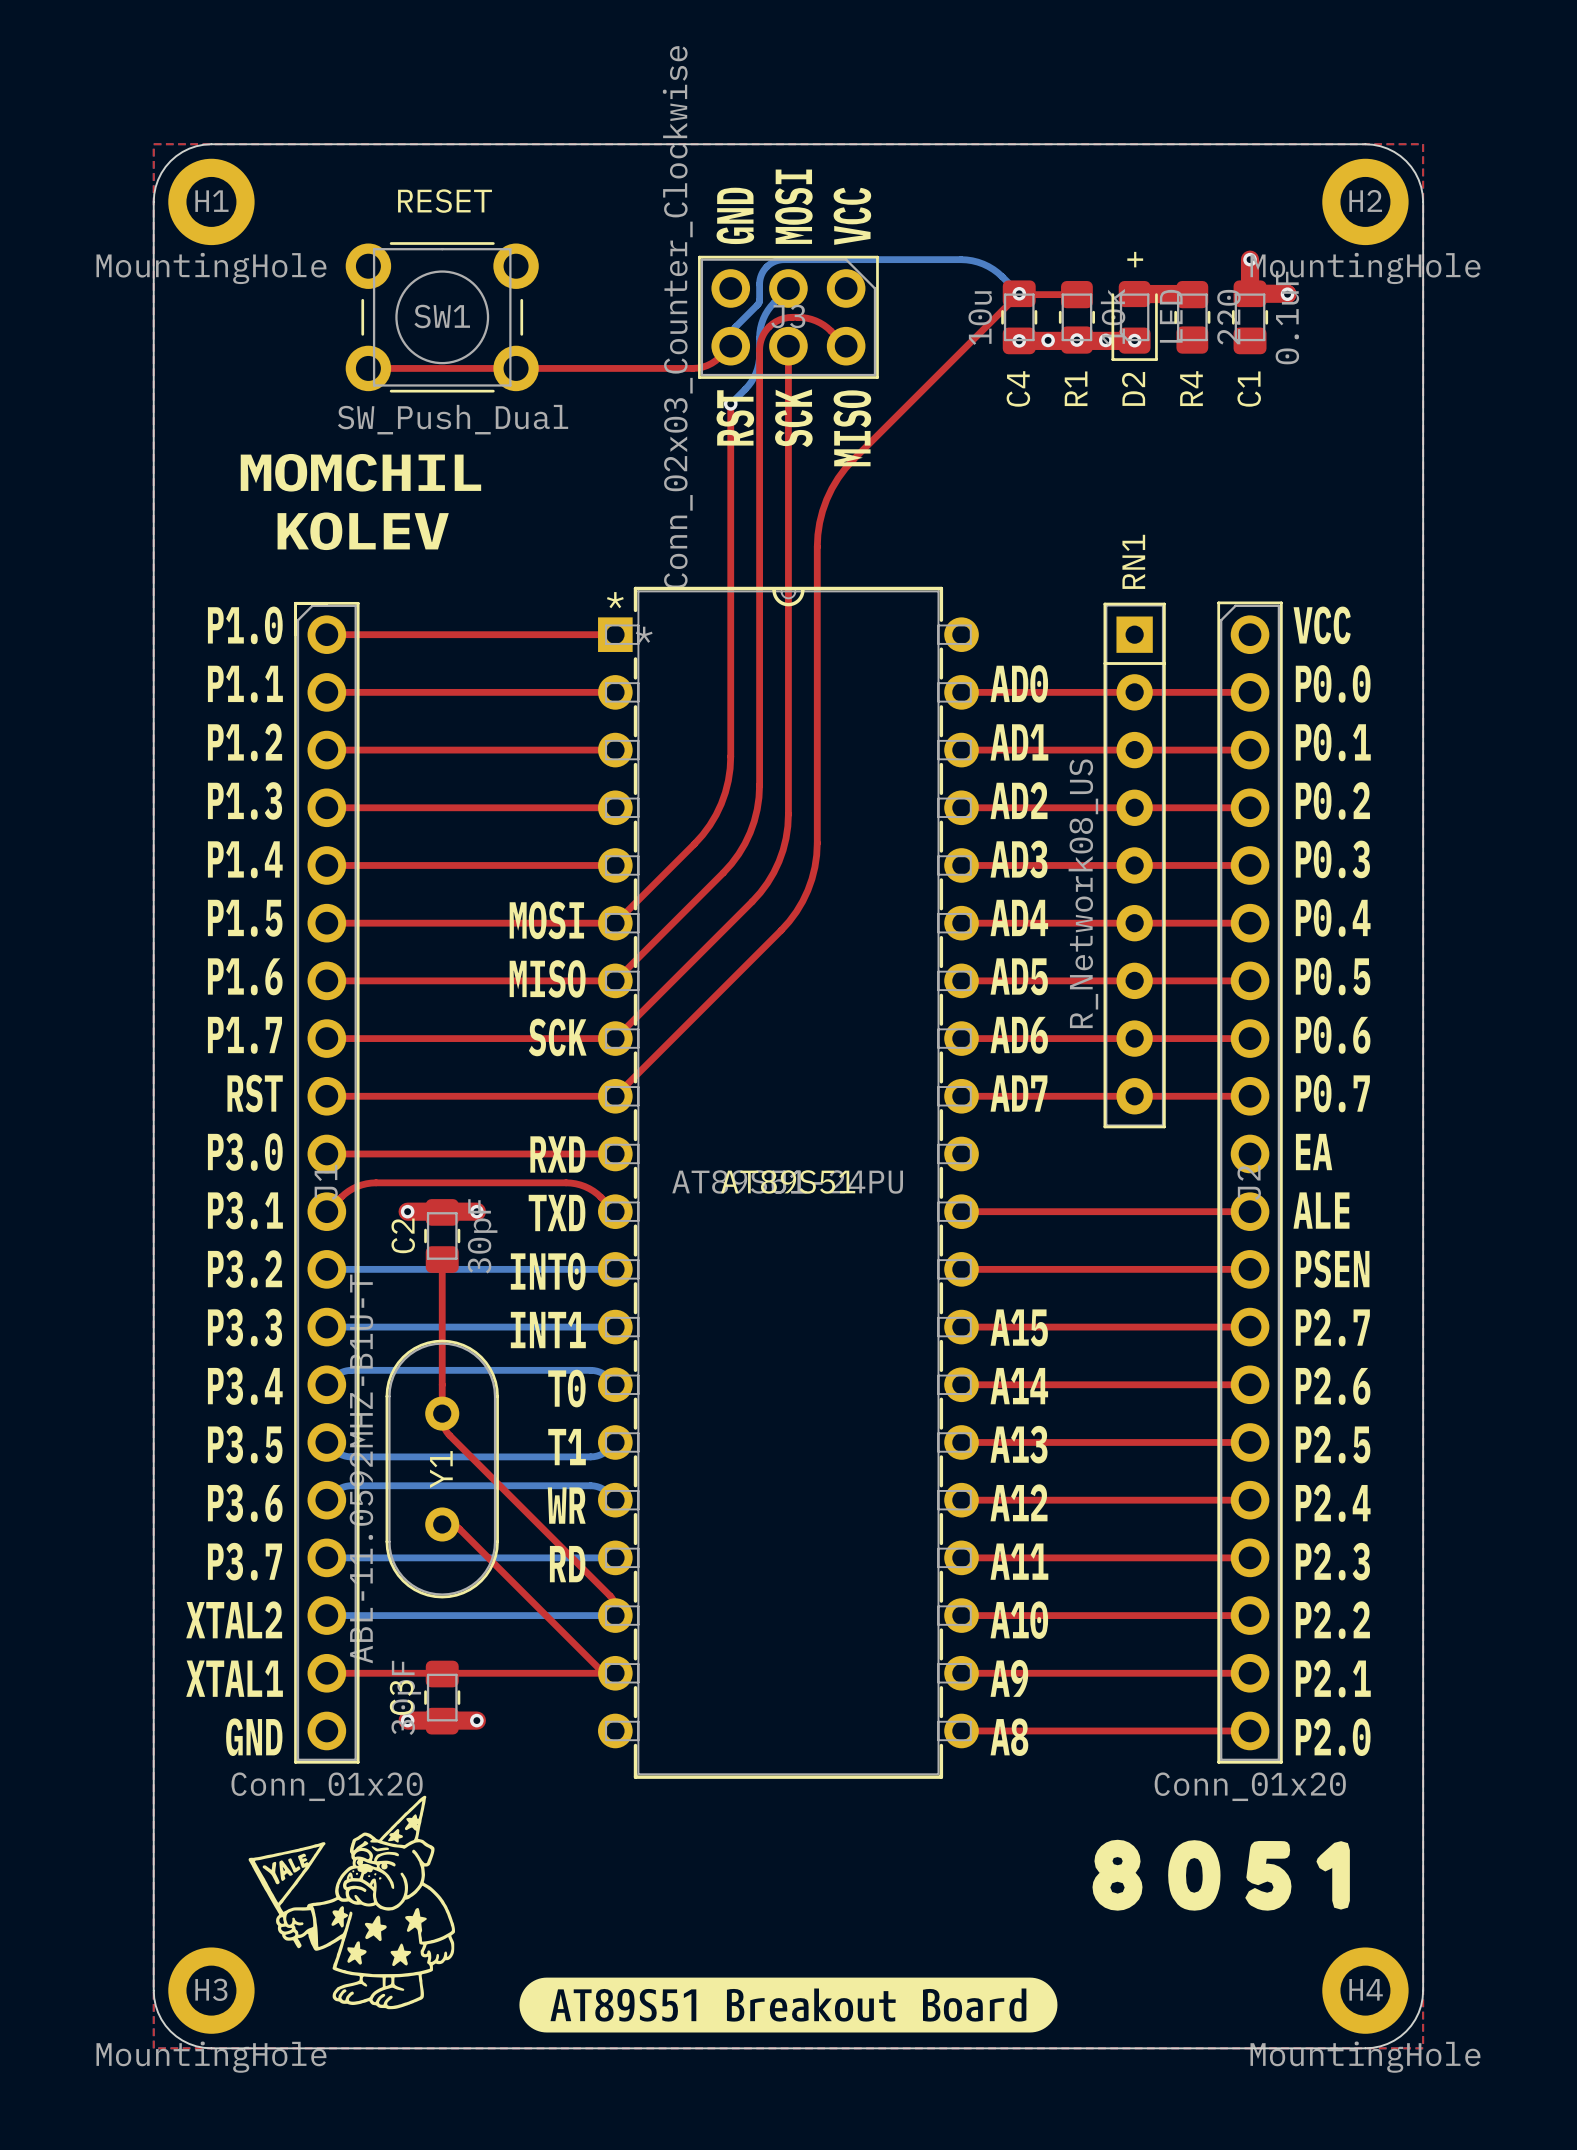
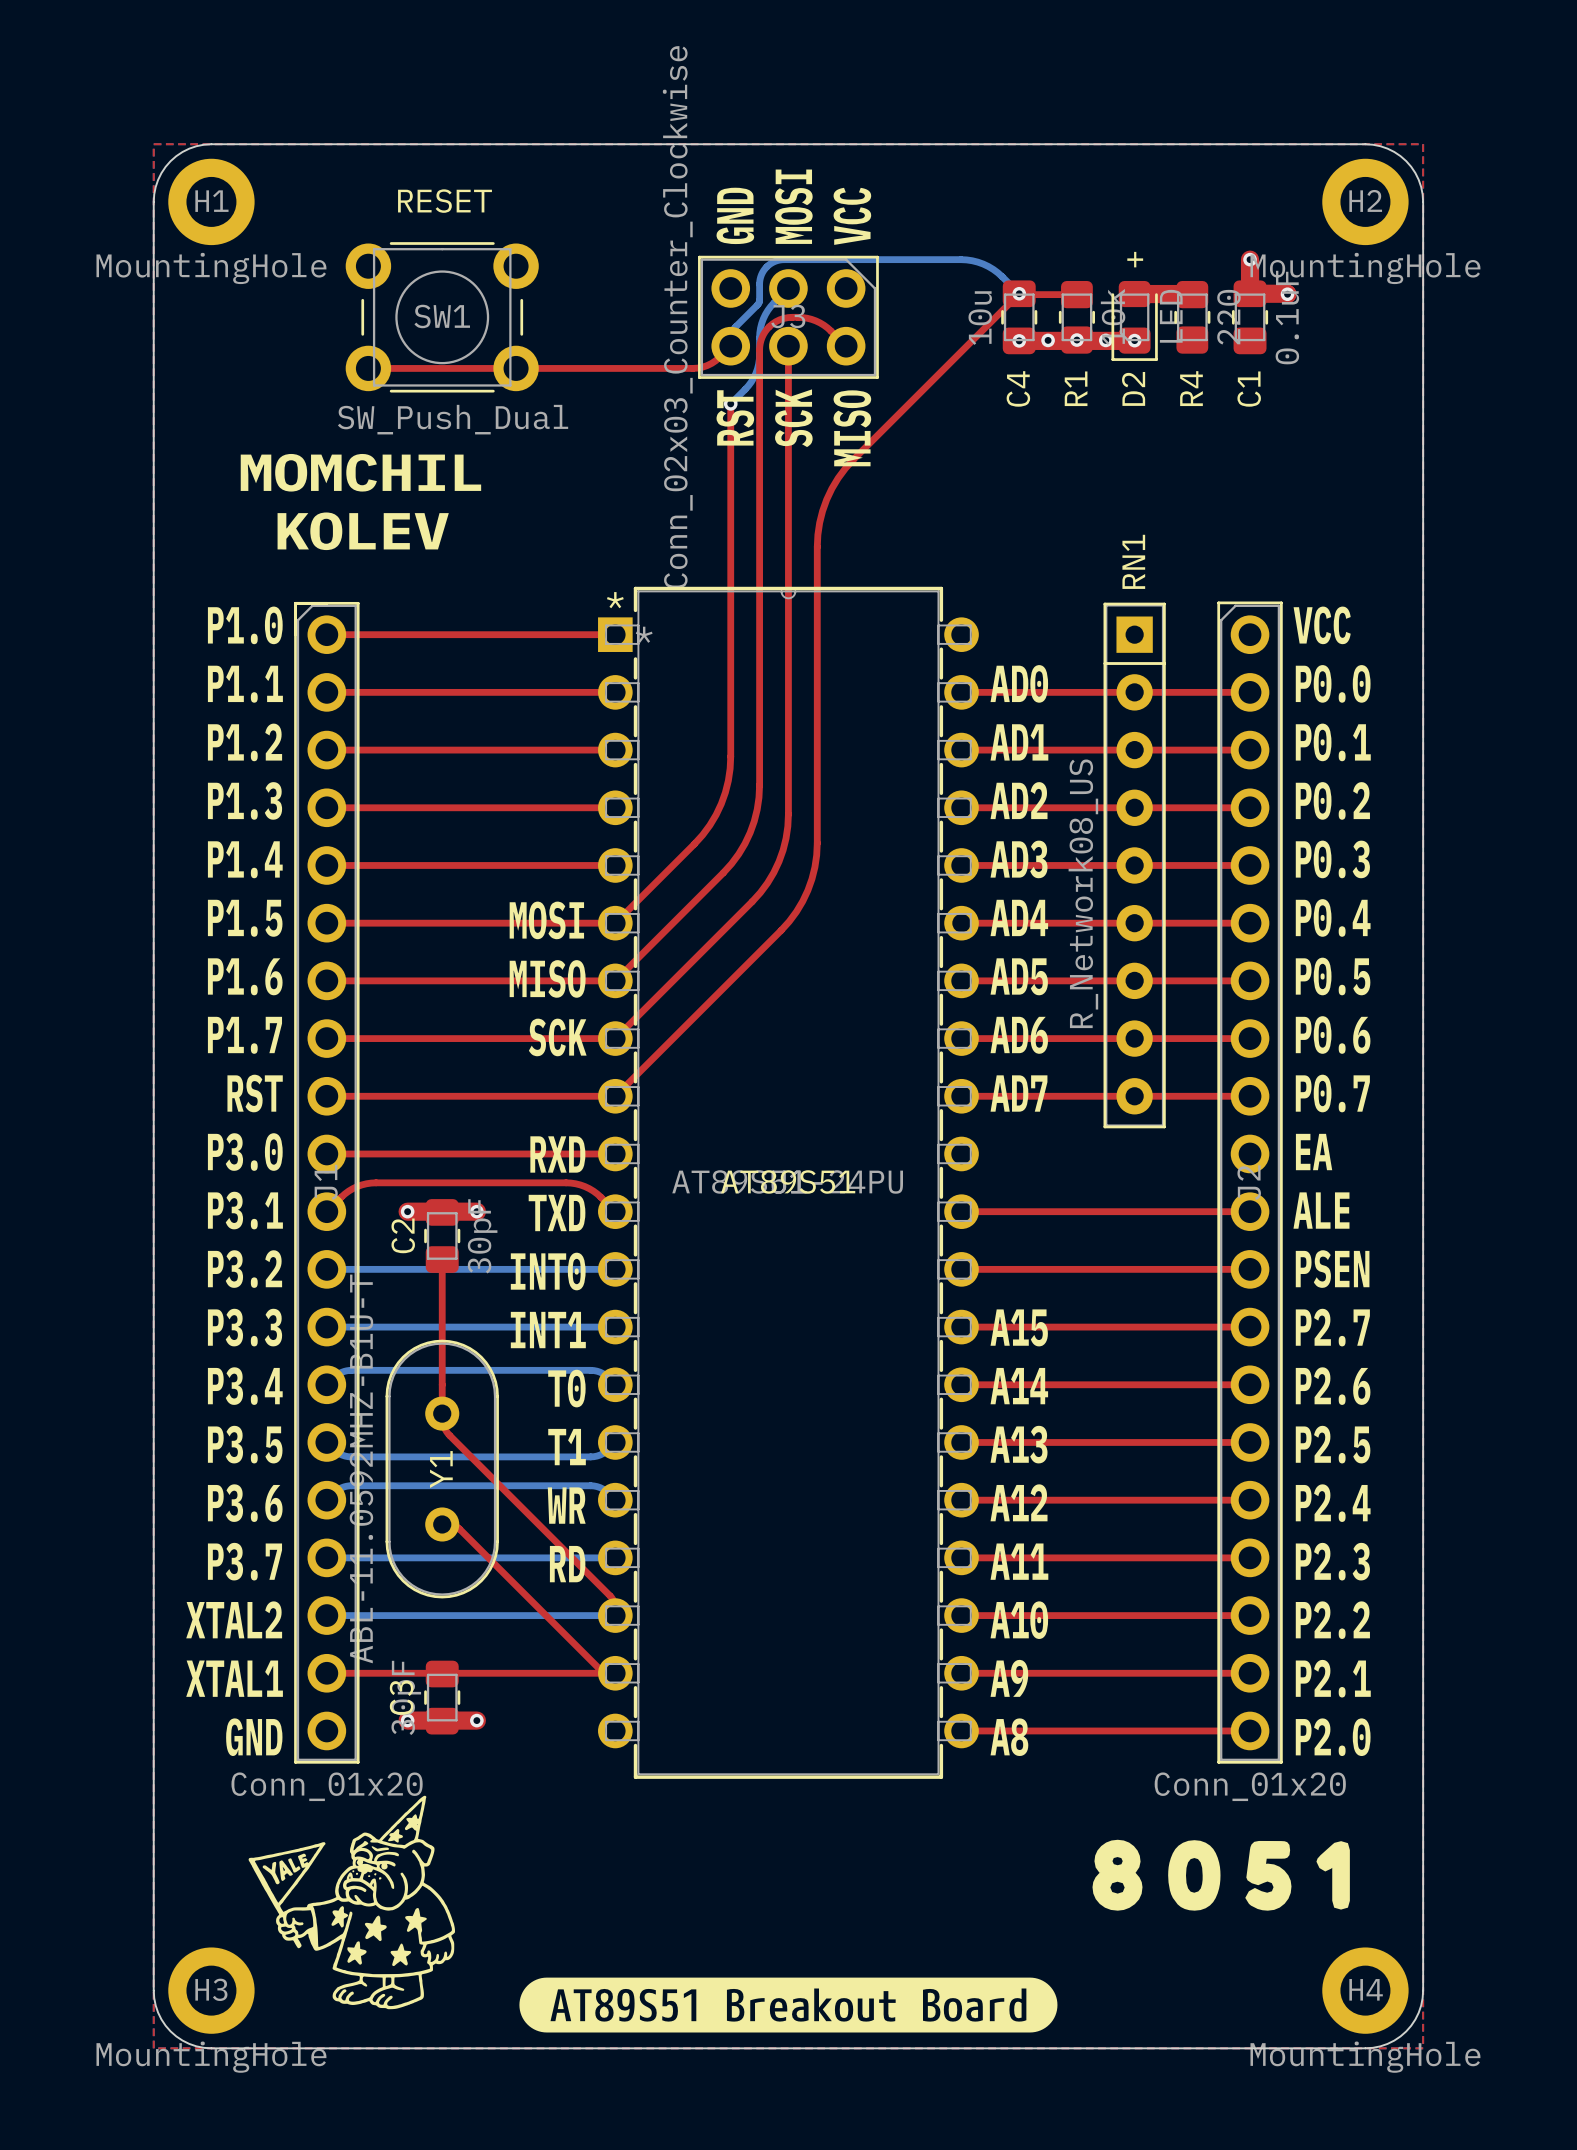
part footprint: [598, 586, 979, 1779] -> [598, 586, 979, 1779]

